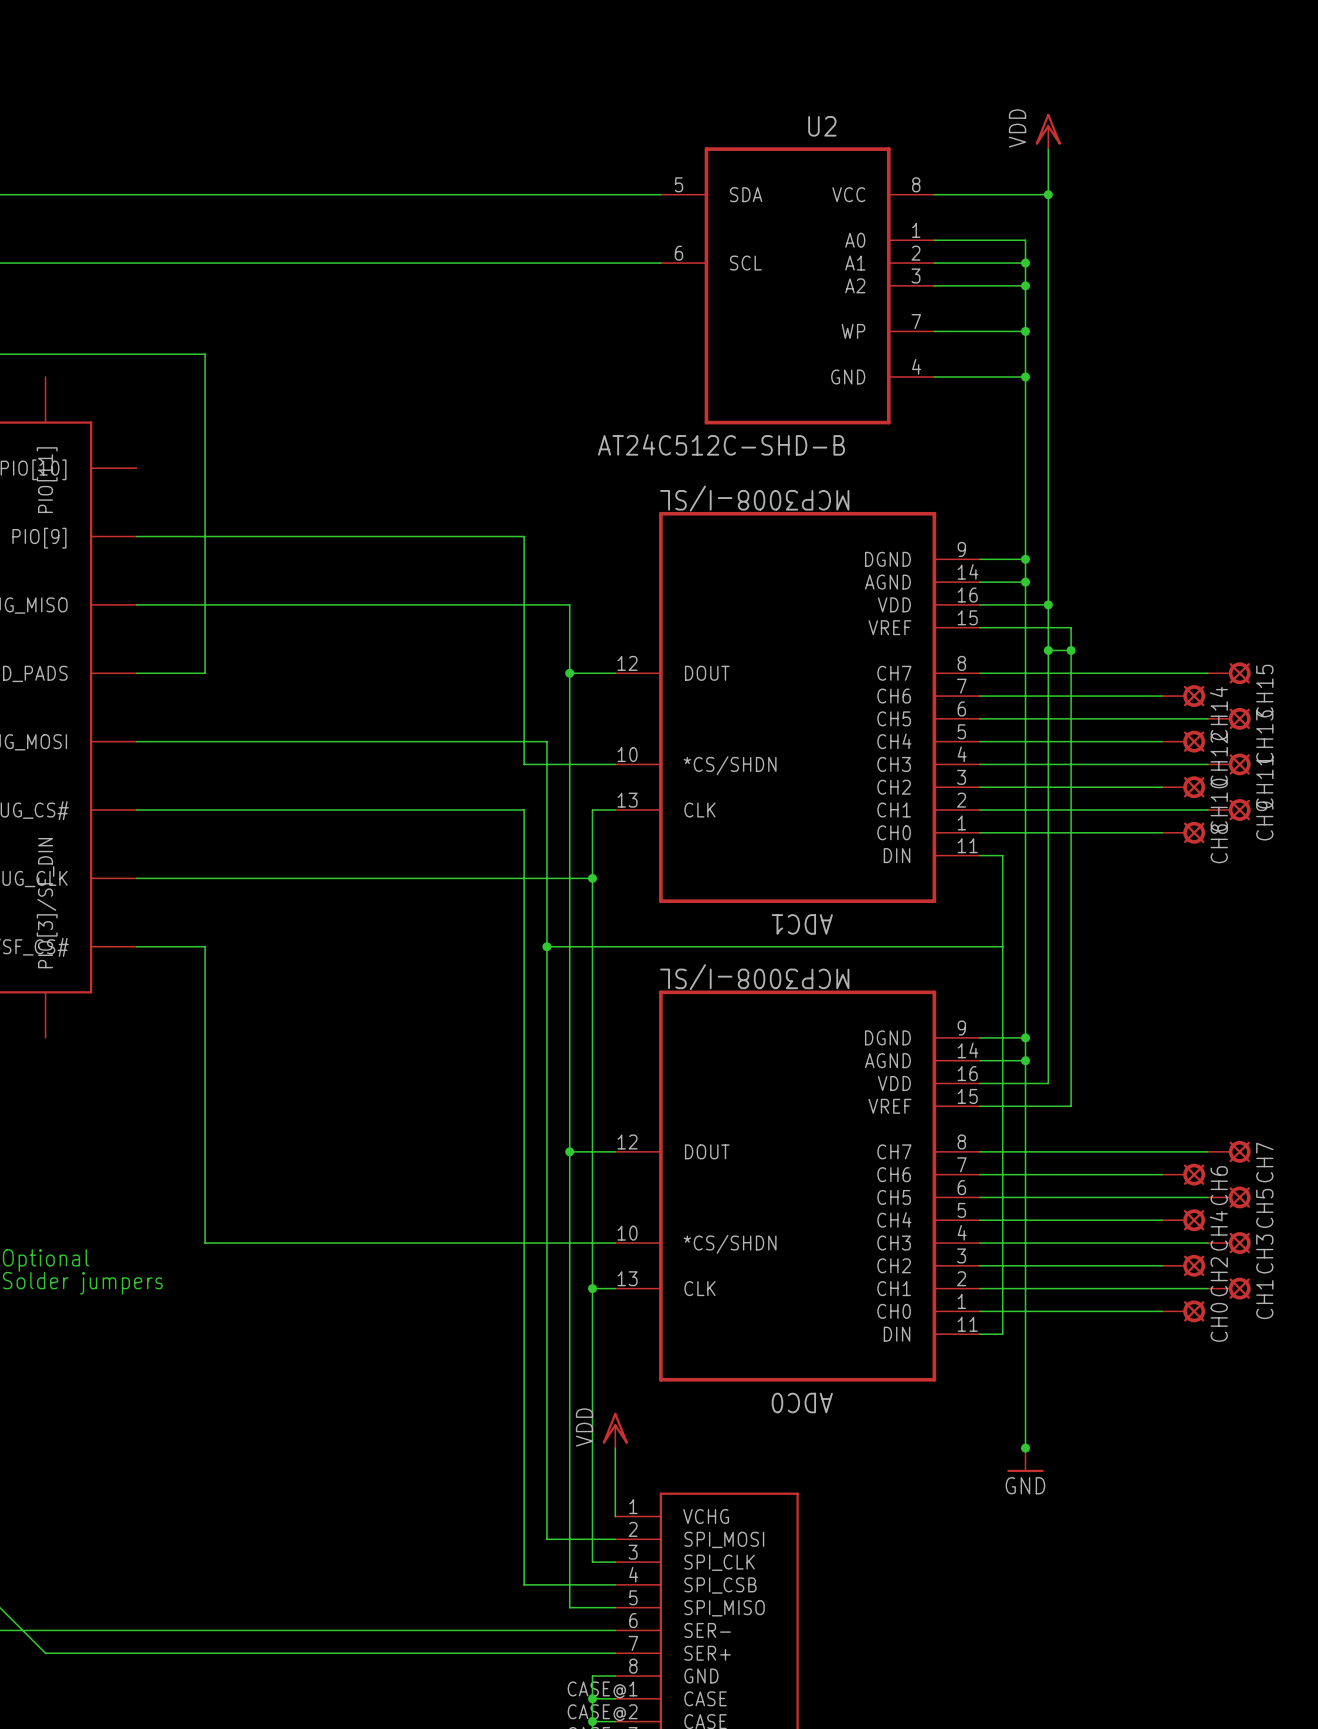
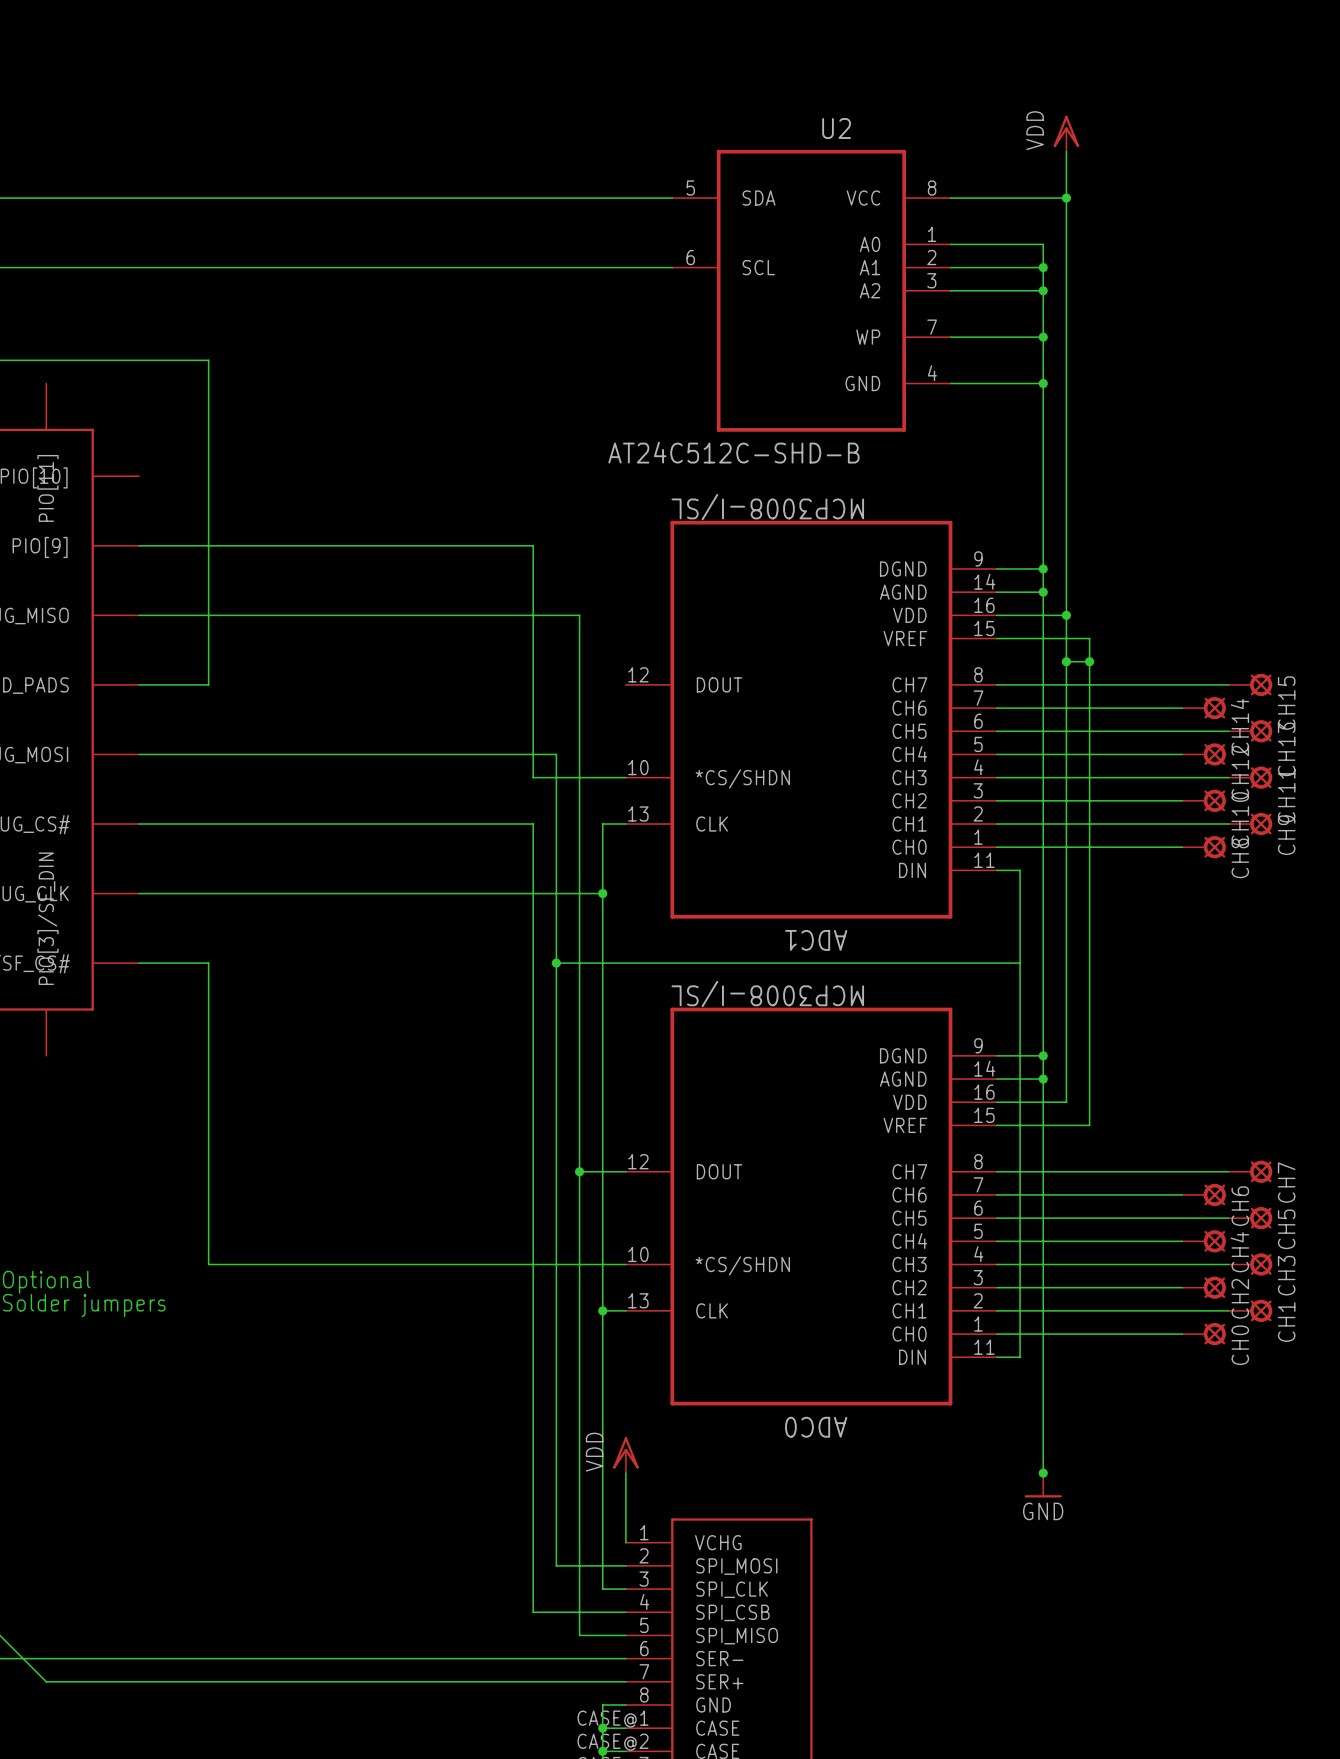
wire: (569, 673) (615, 673) -> none
junction: (569, 673) -> none

